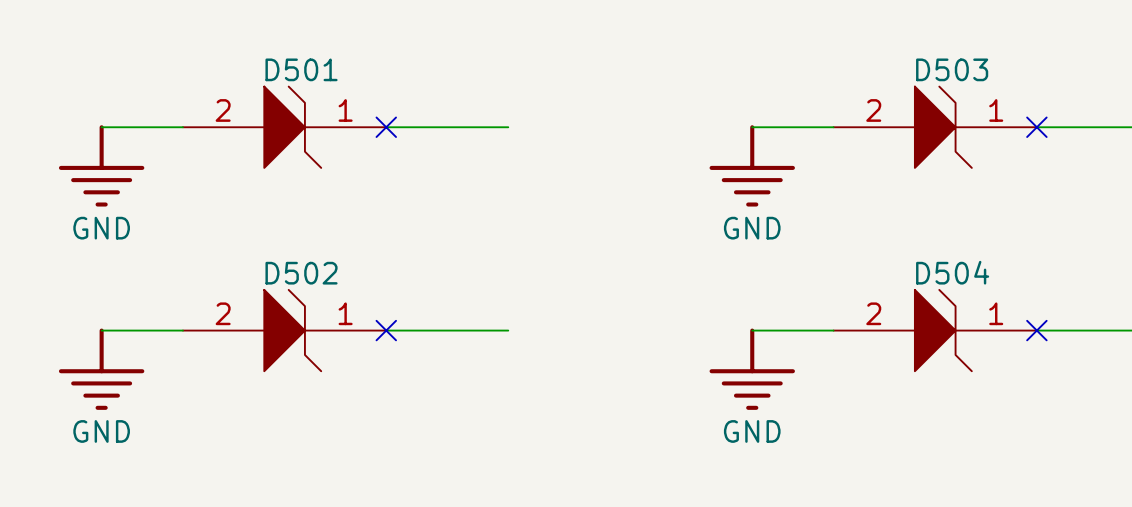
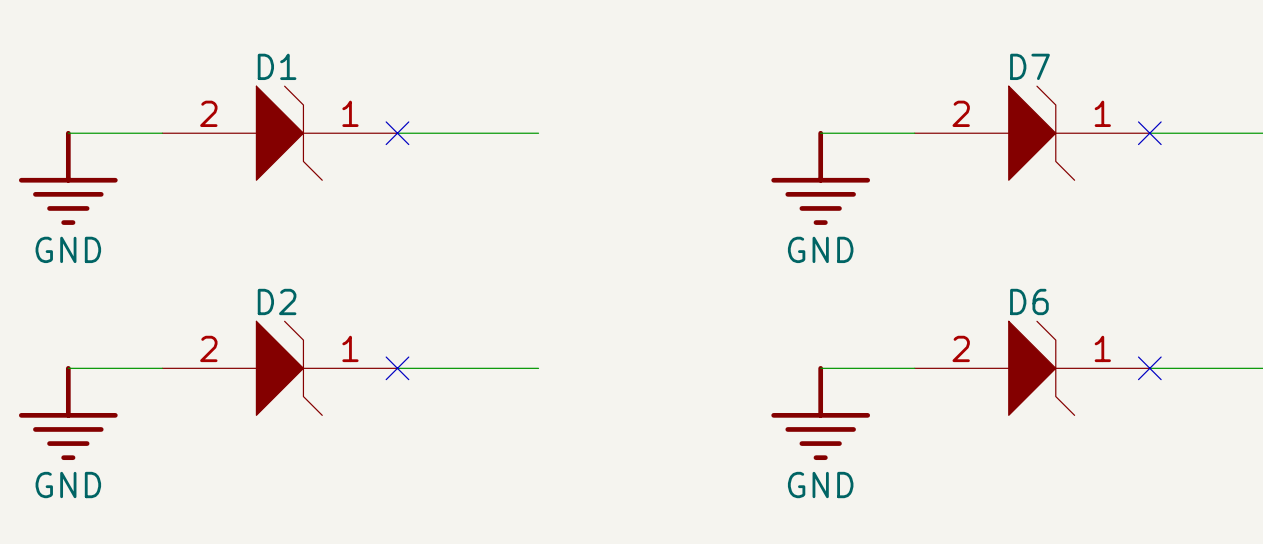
D501 name: D501 (301, 69) -> D1 (277, 66)
D503 name: D503 (952, 69) -> D7 (1029, 66)
D504 name: D504 (952, 272) -> D6 (1029, 301)
D502 name: D502 (301, 273) -> D2 (277, 301)

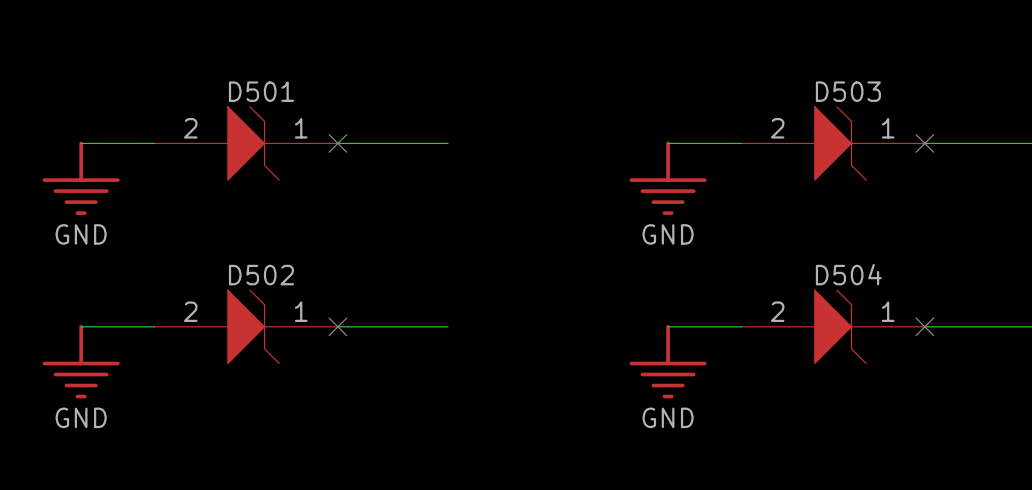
D1 name: D1 (277, 66) -> D501 (261, 91)
D7 name: D7 (1029, 66) -> D503 (848, 91)
D2 name: D2 (277, 301) -> D502 (261, 275)
D6 name: D6 (1029, 301) -> D504 (848, 274)

